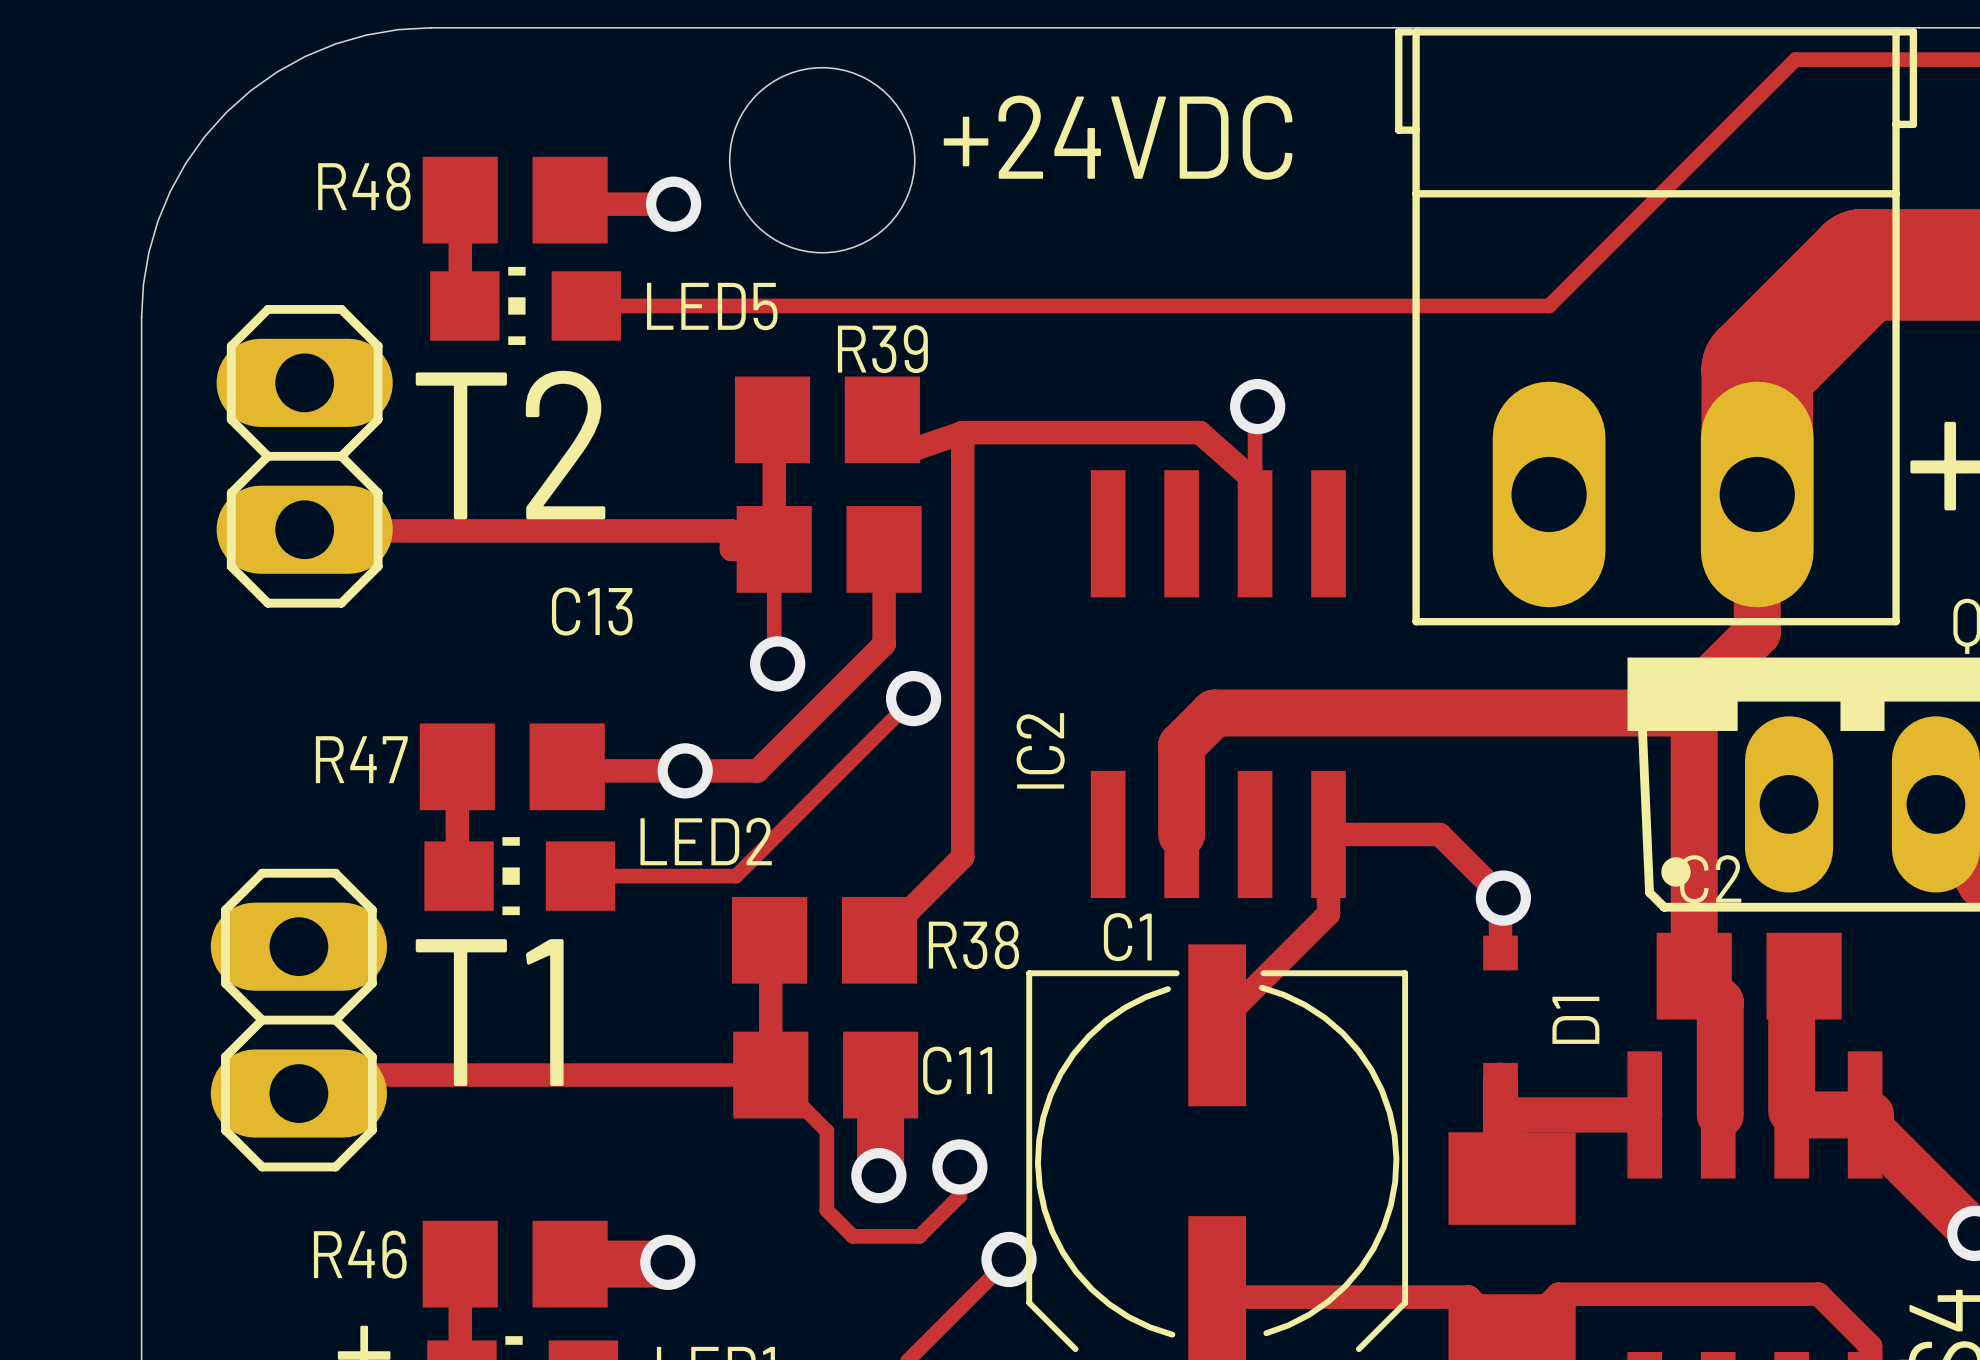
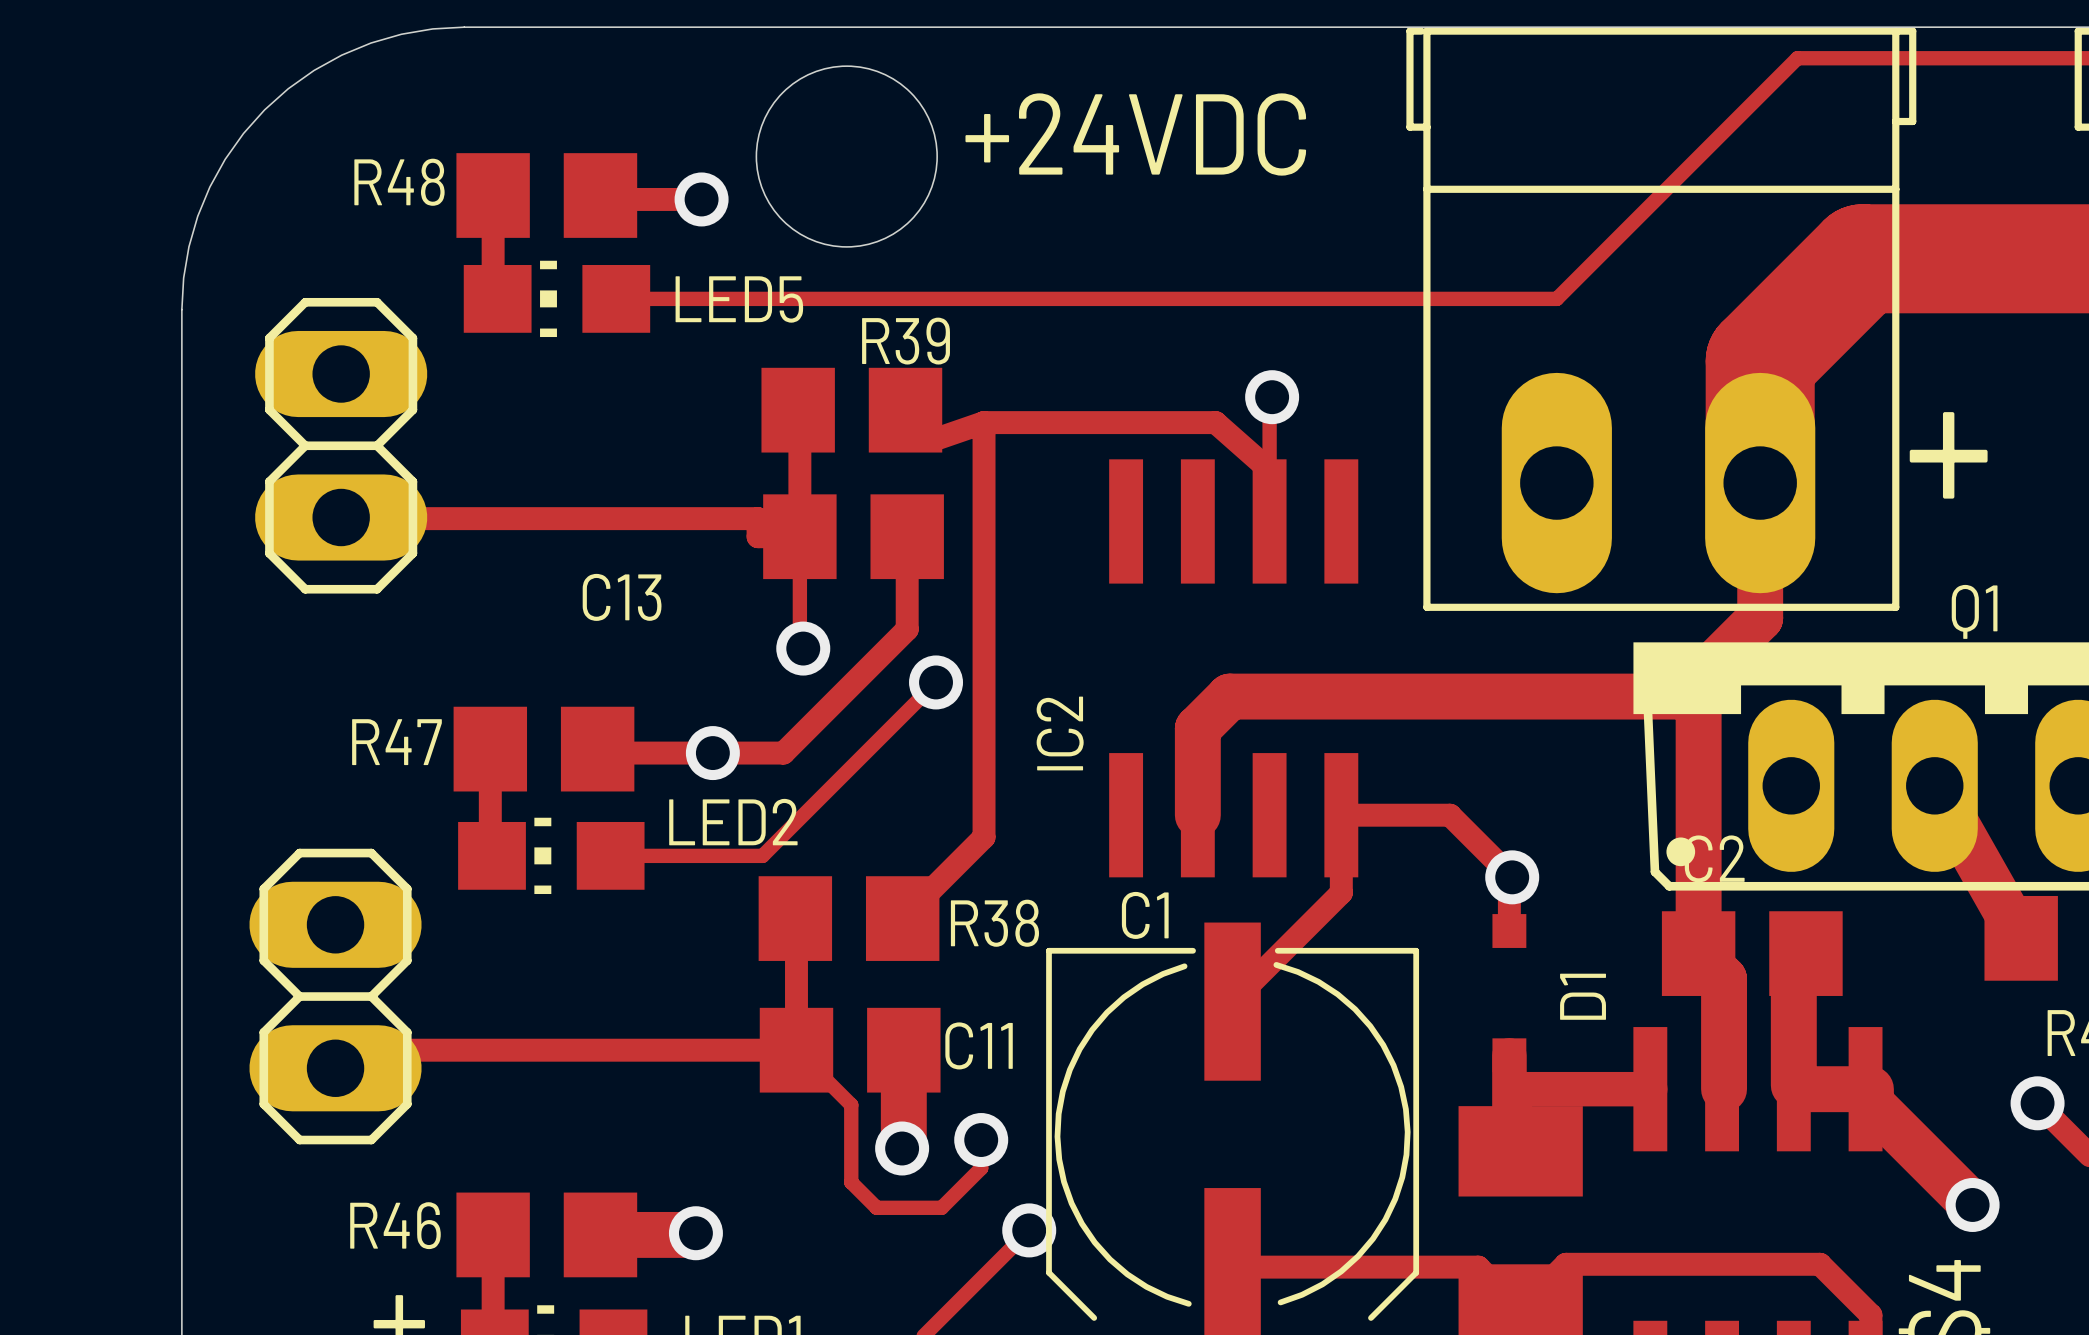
text: T2 (510, 445) -> none
text: T1 (489, 1012) -> none

